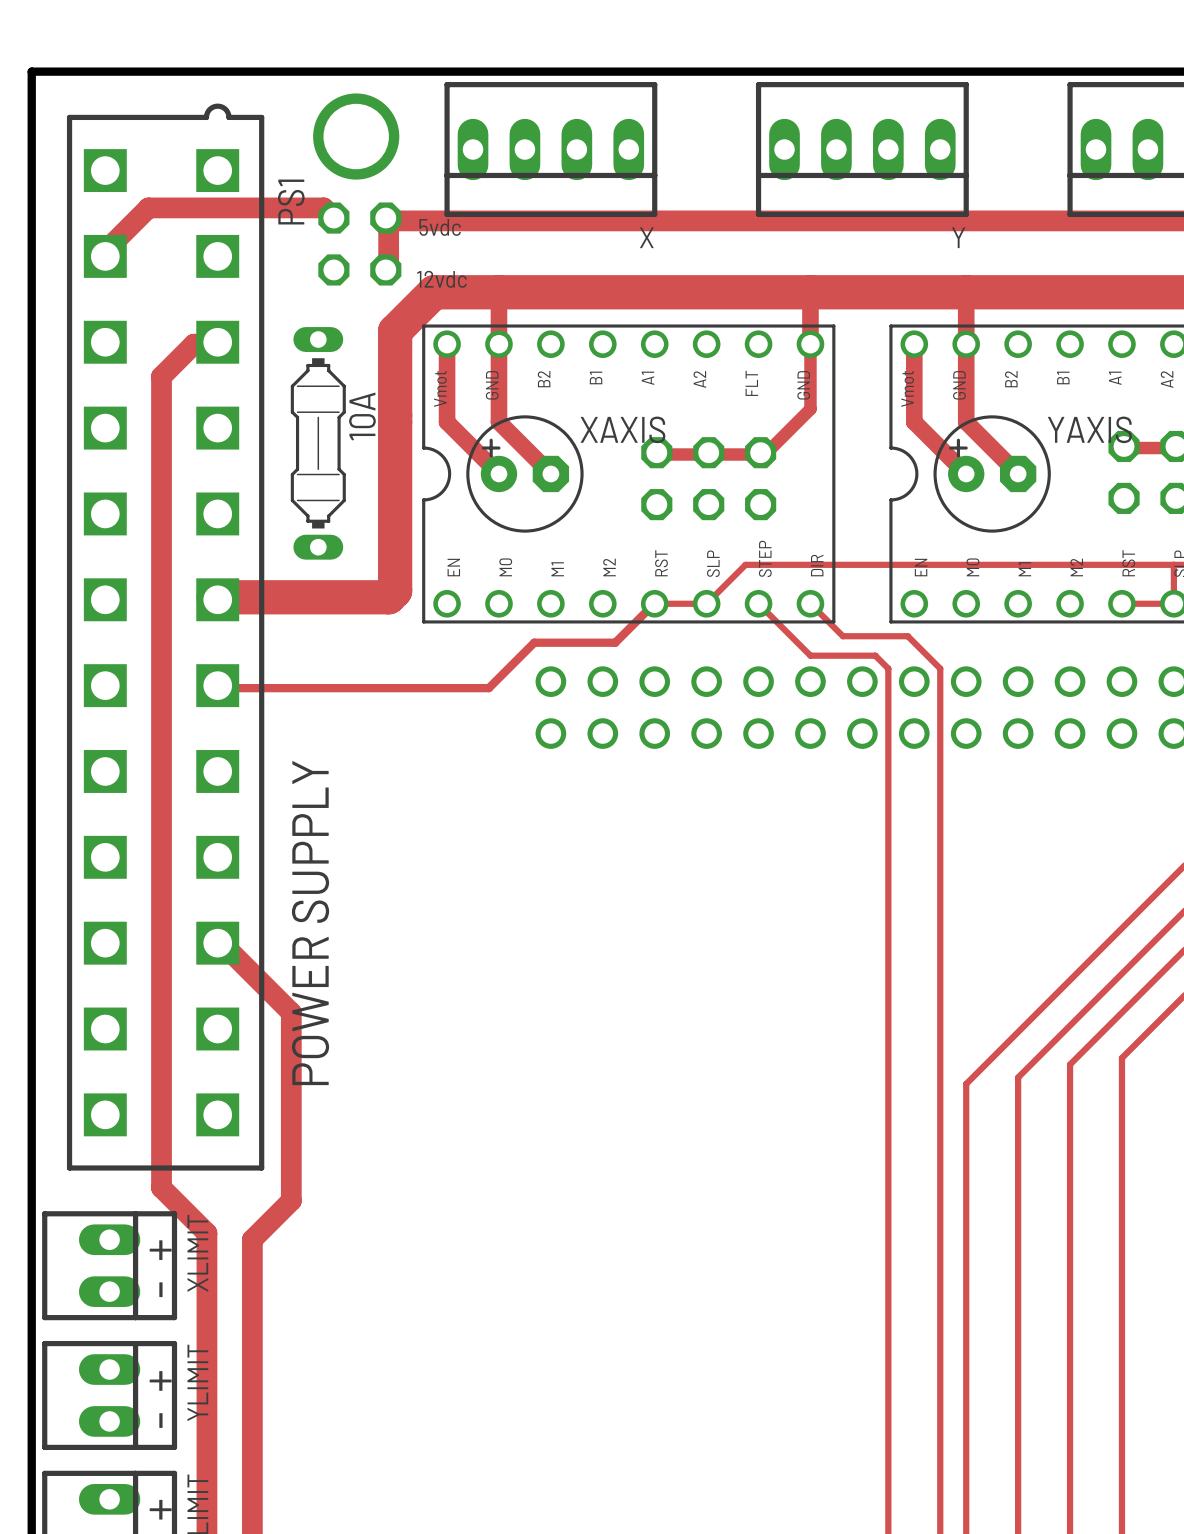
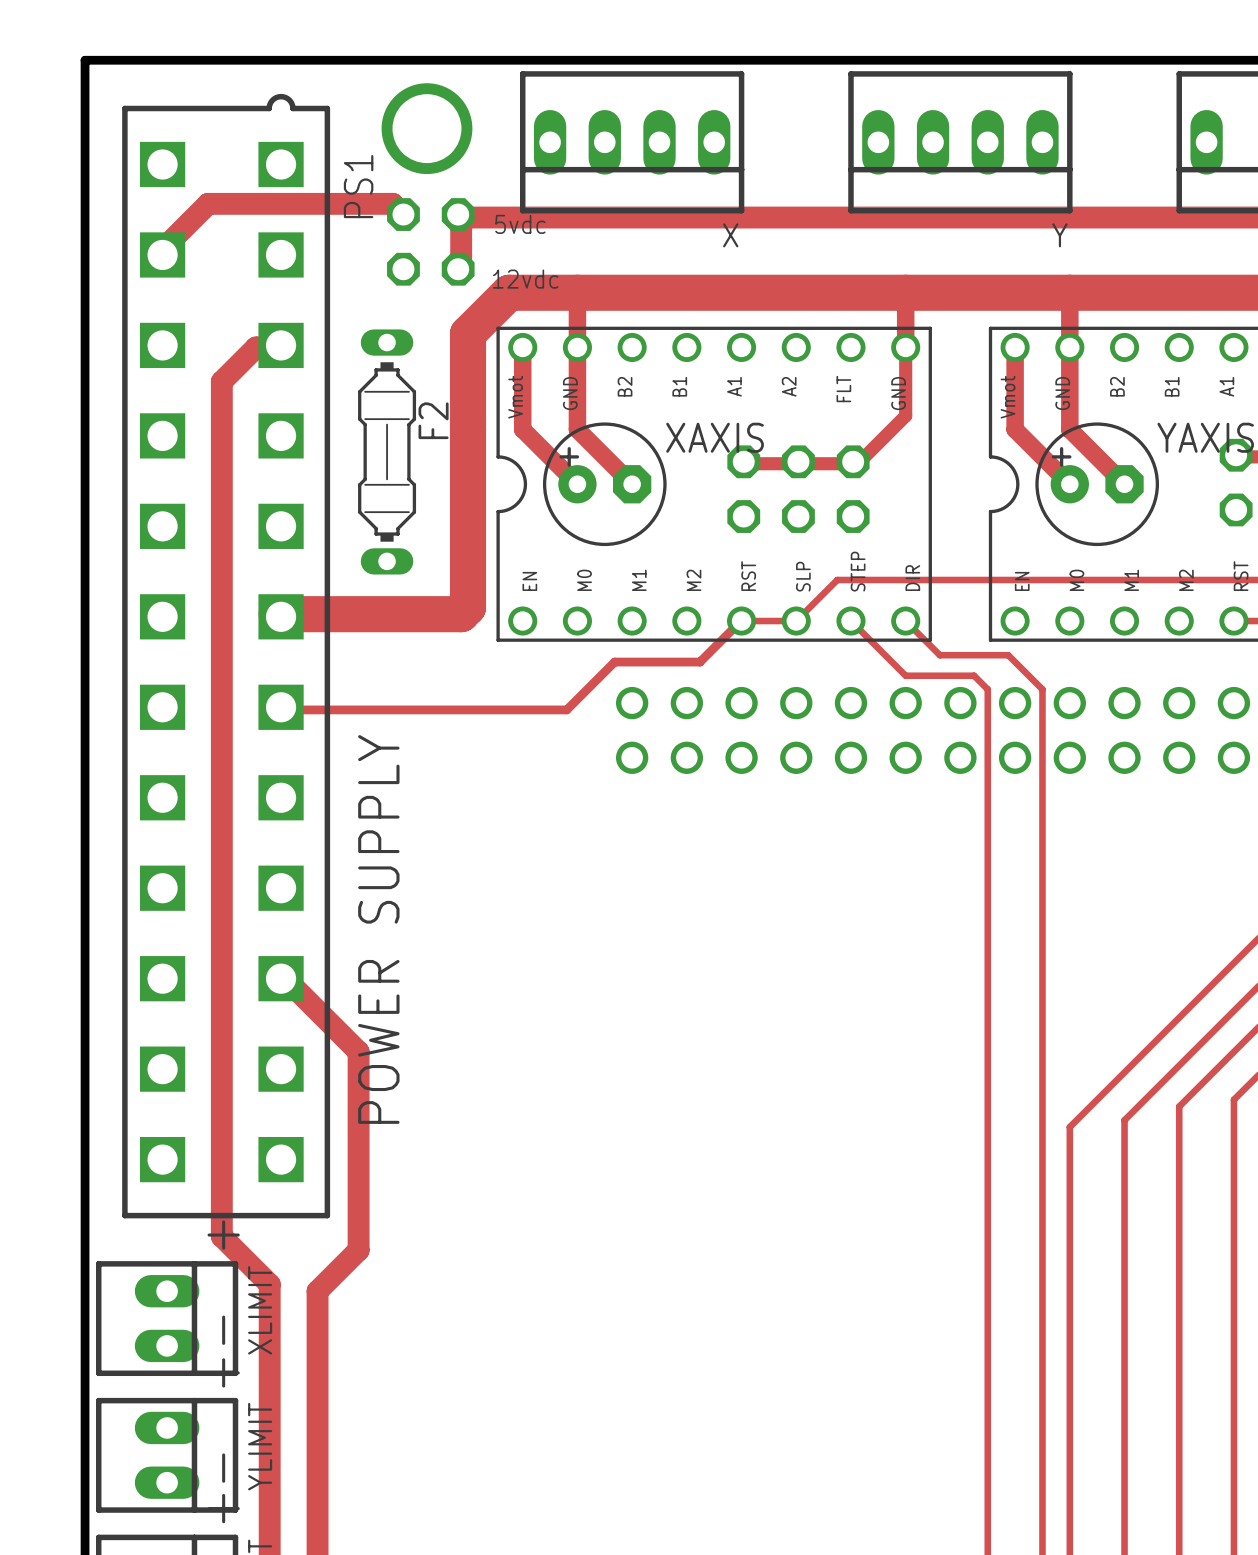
10A name: 10A (362, 416) -> F2 (433, 420)

